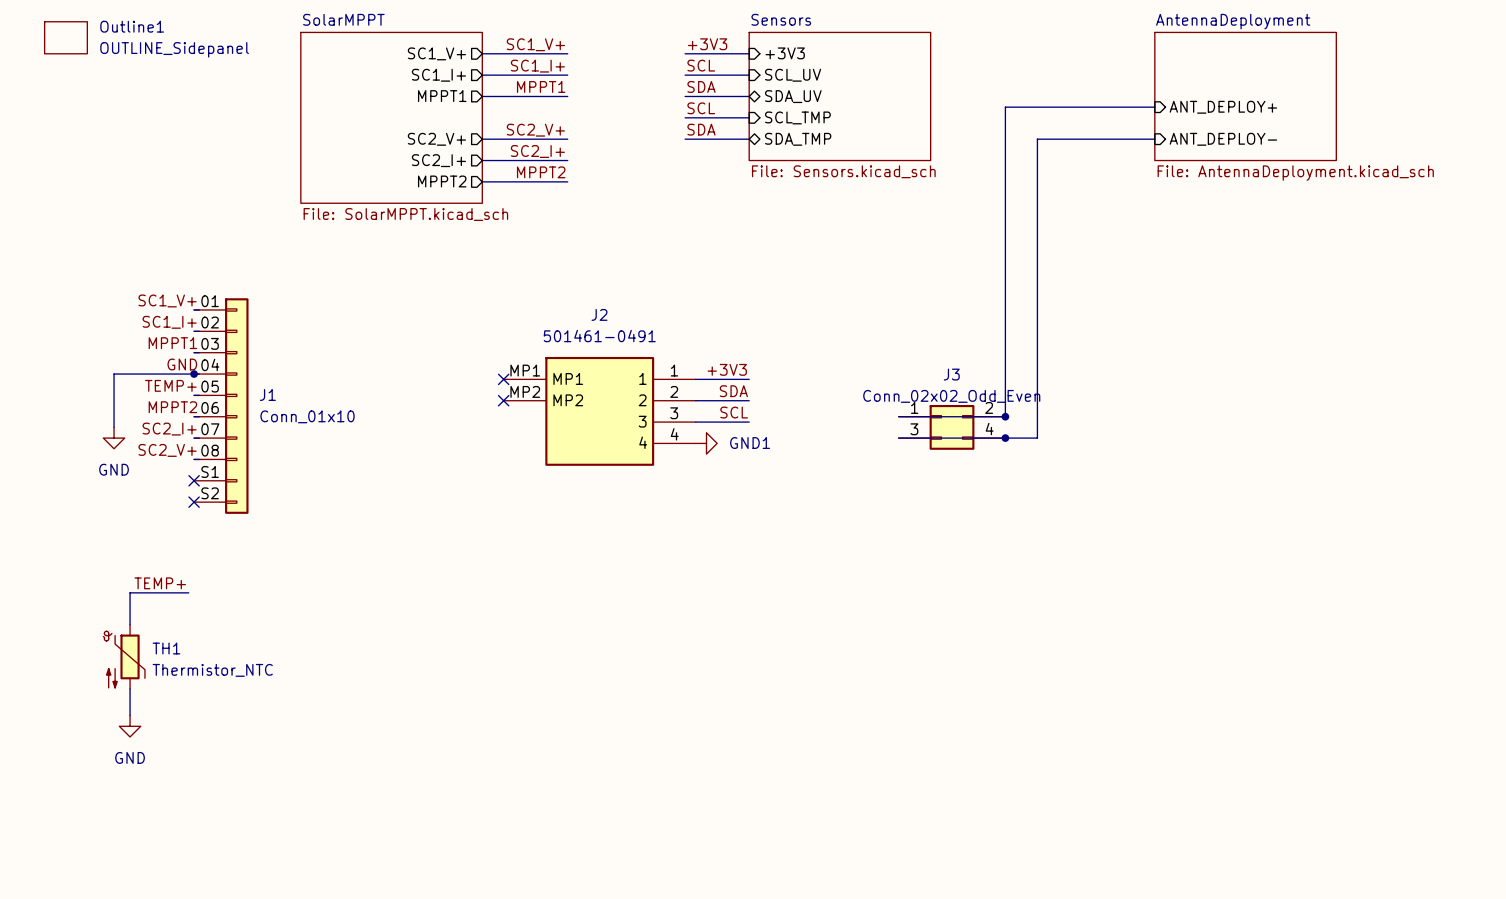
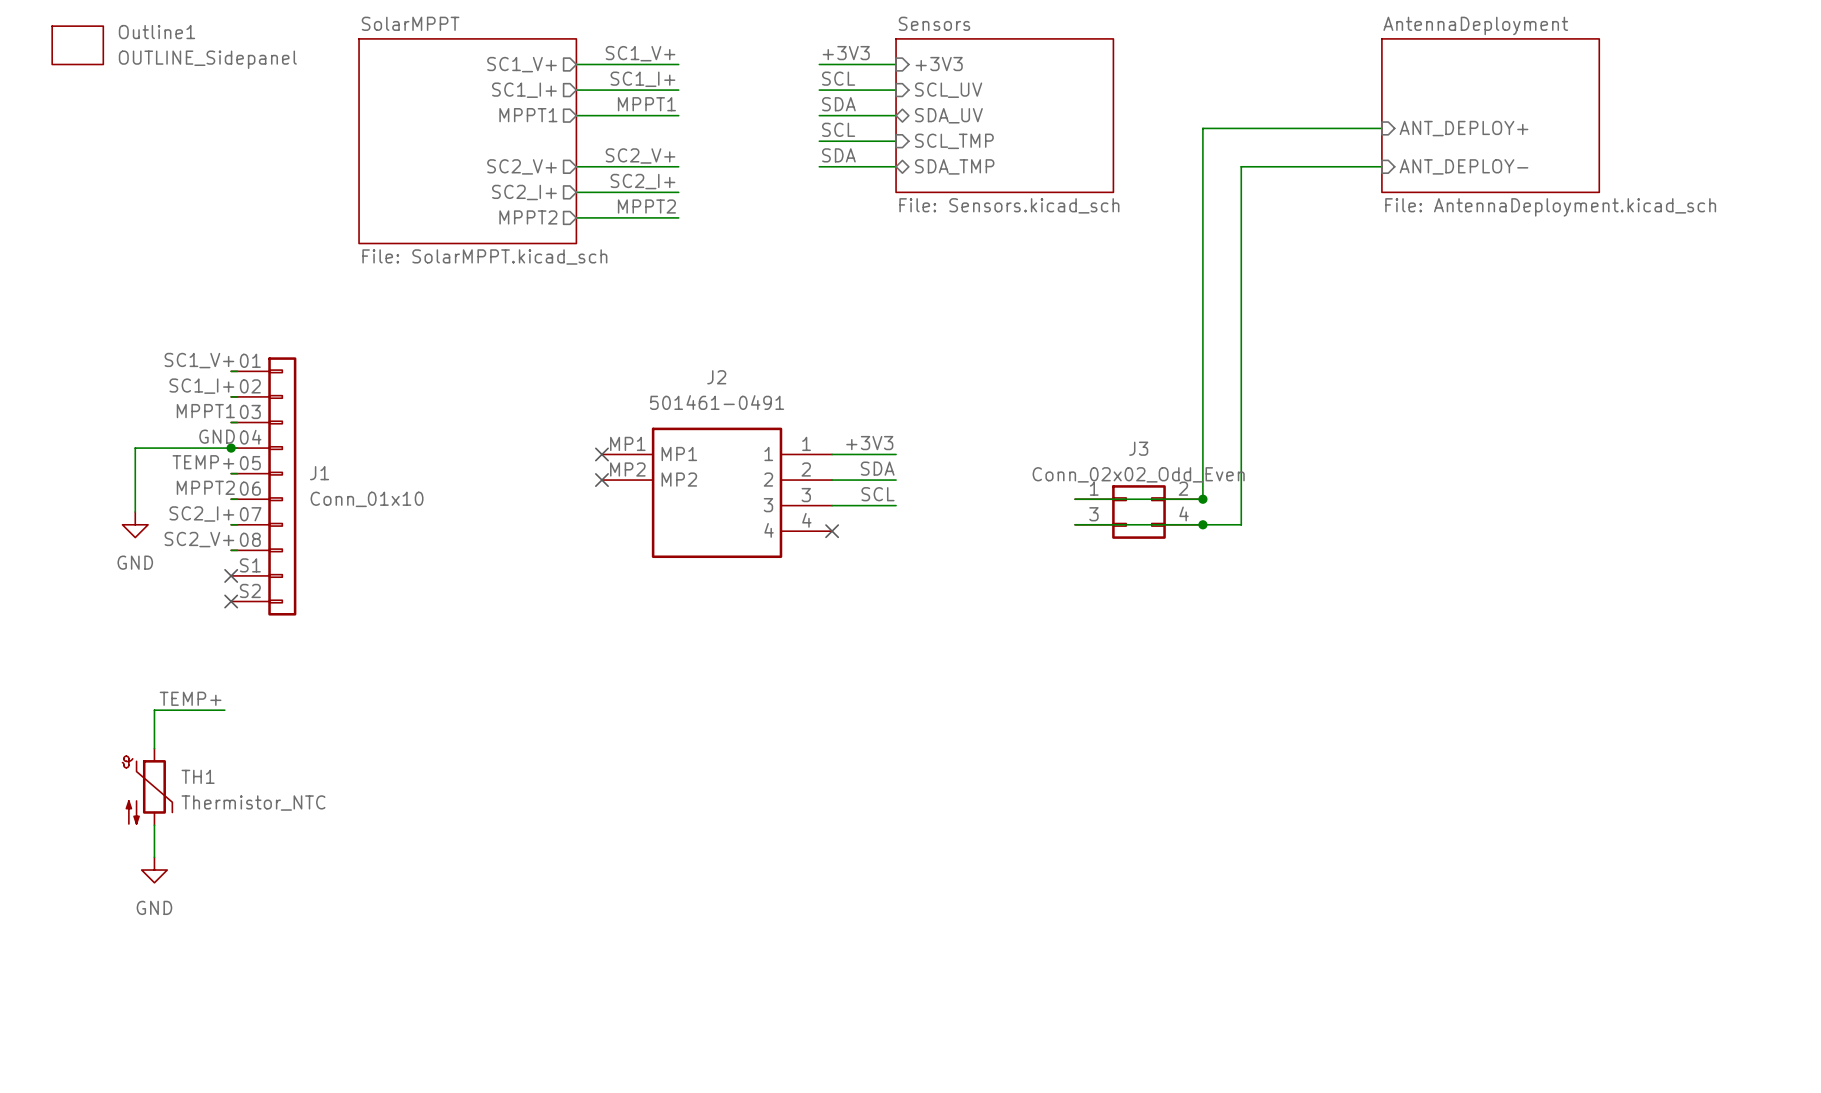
no-connect mark: none -> (832, 531)
power symbol: GND1 (706, 443) -> none

